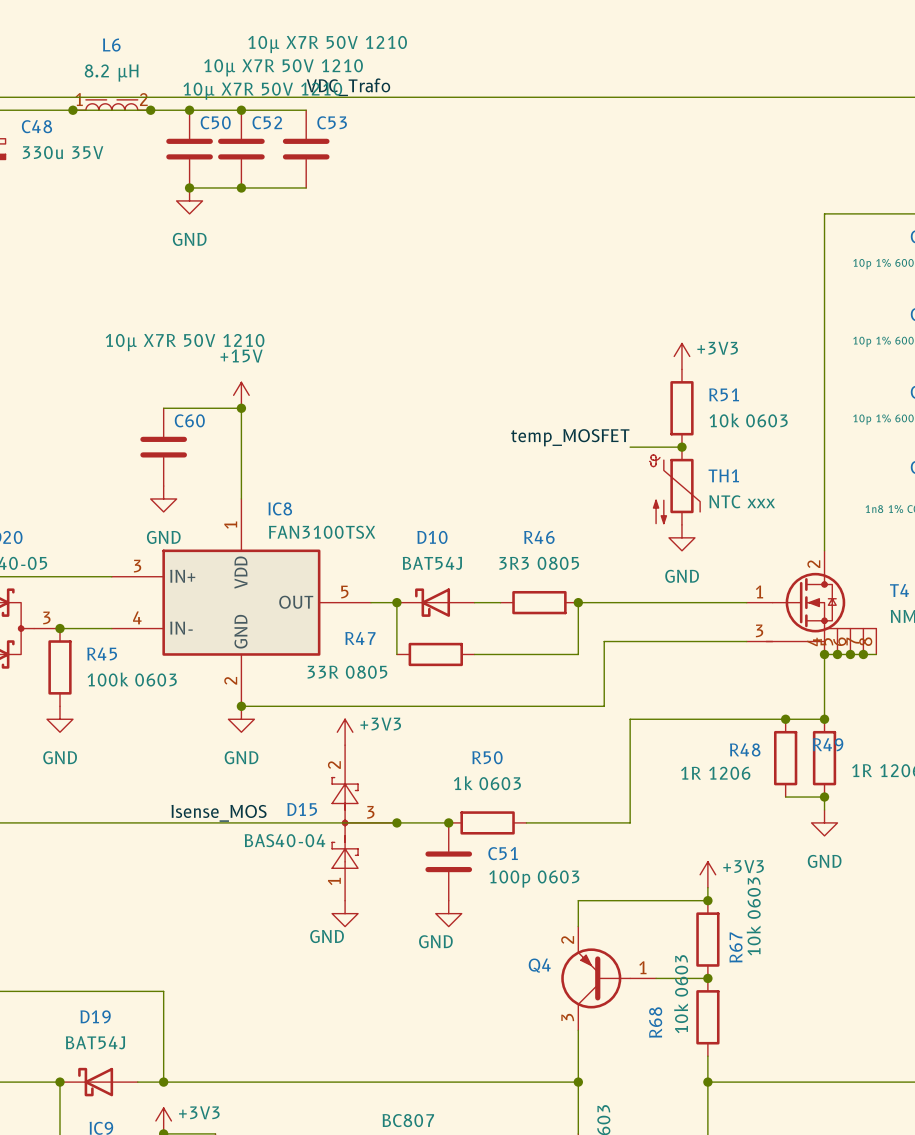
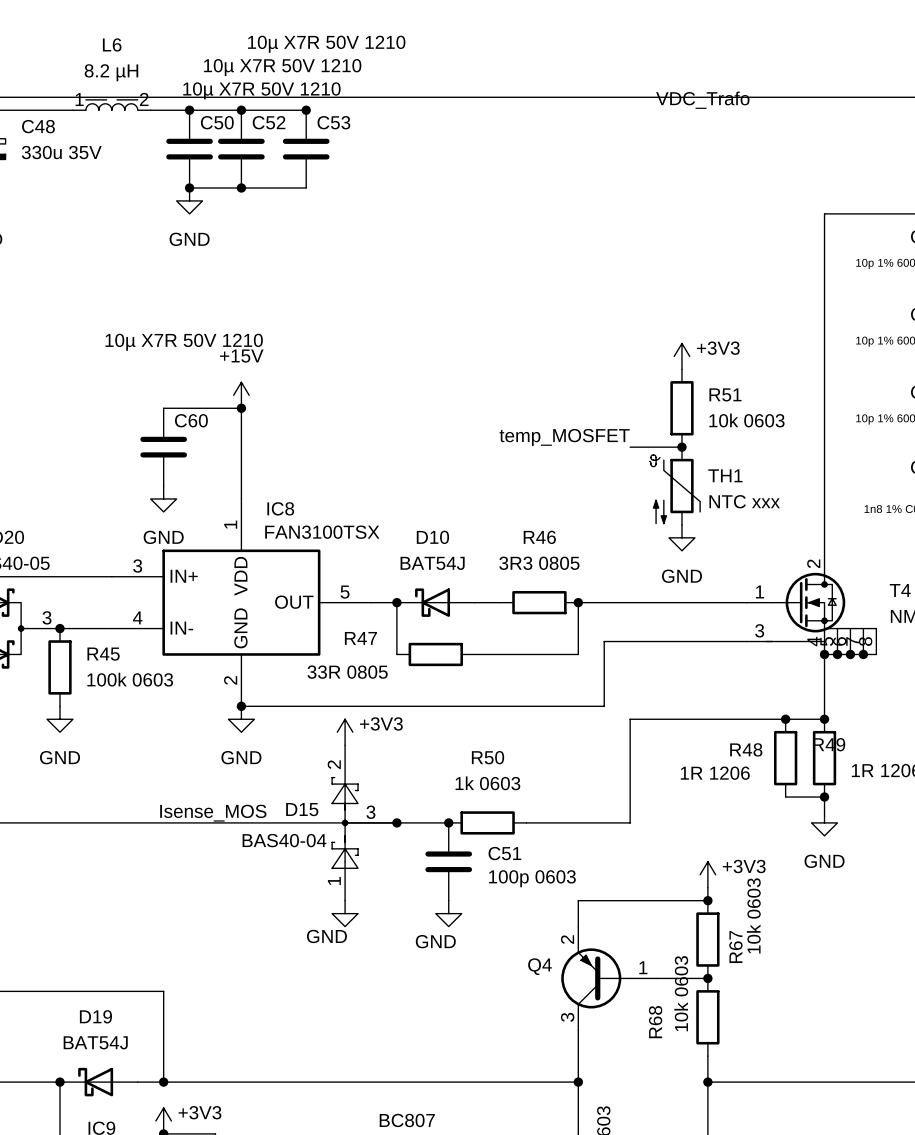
label: VDC_Trafo (348, 87) -> none
label: none -> VDC_Trafo (702, 100)
wire: (72, 110) (150, 110) -> none
junction: (72, 110) -> none
junction: (150, 110) -> none
junction: none -> (306, 110)

